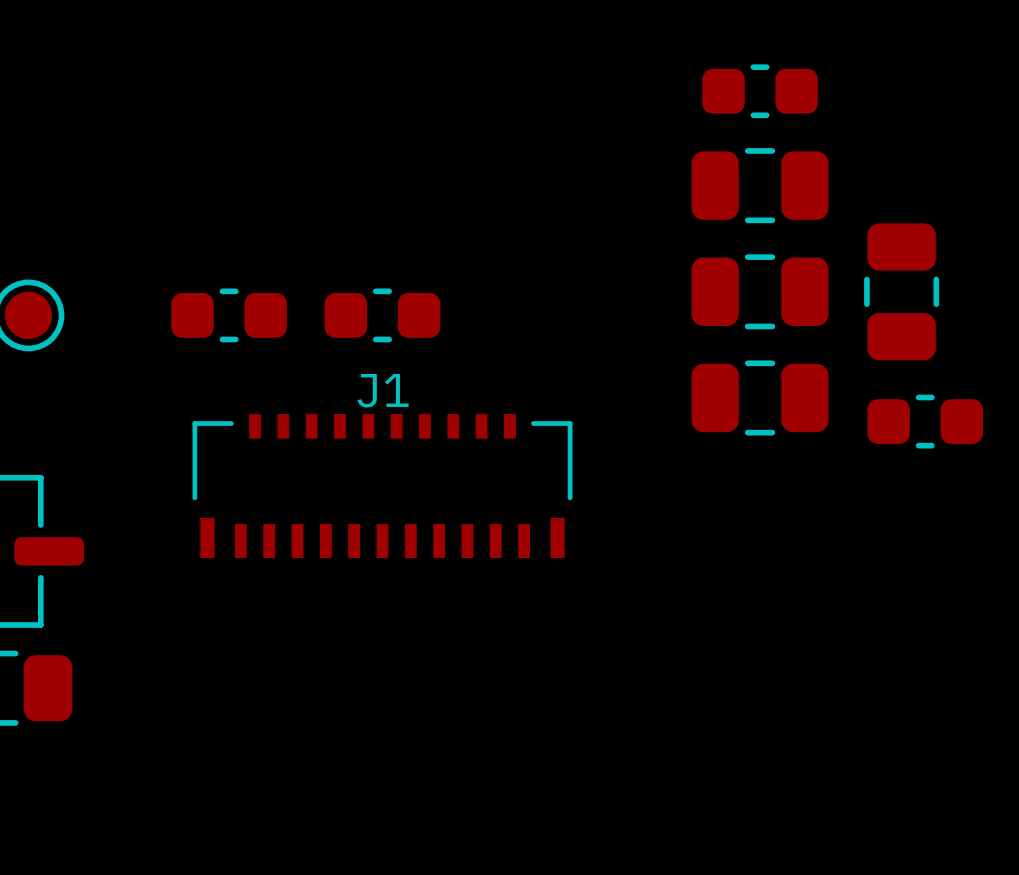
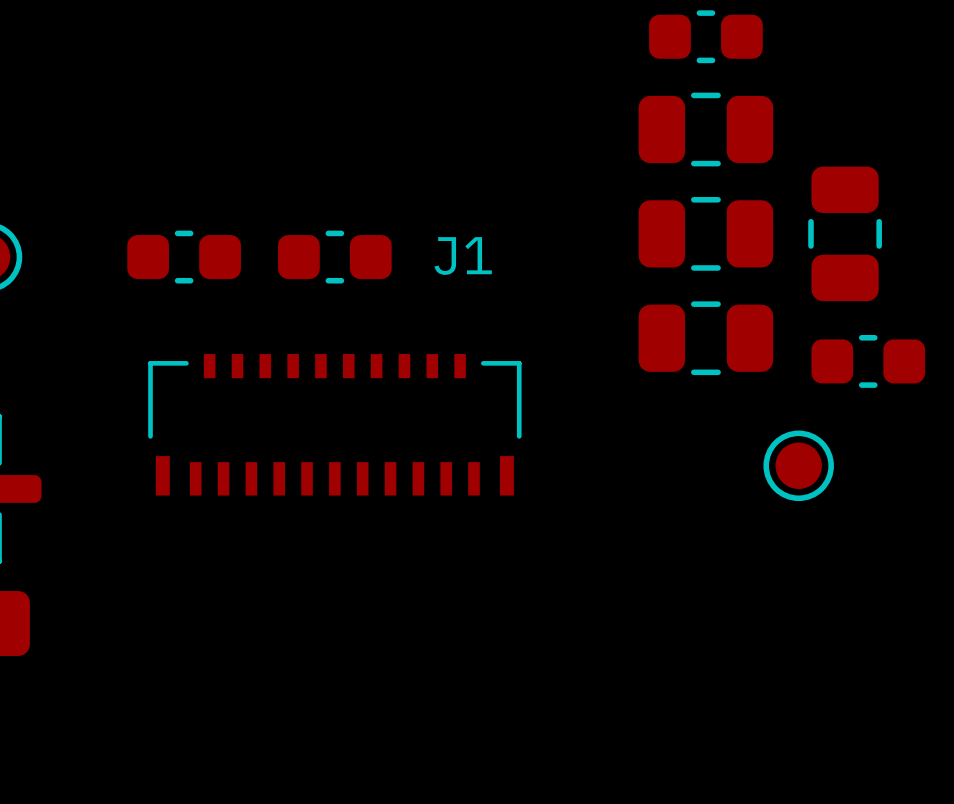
J1 name position: J1 (383, 390) -> J1 (463, 256)
part: none -> (798, 465)

